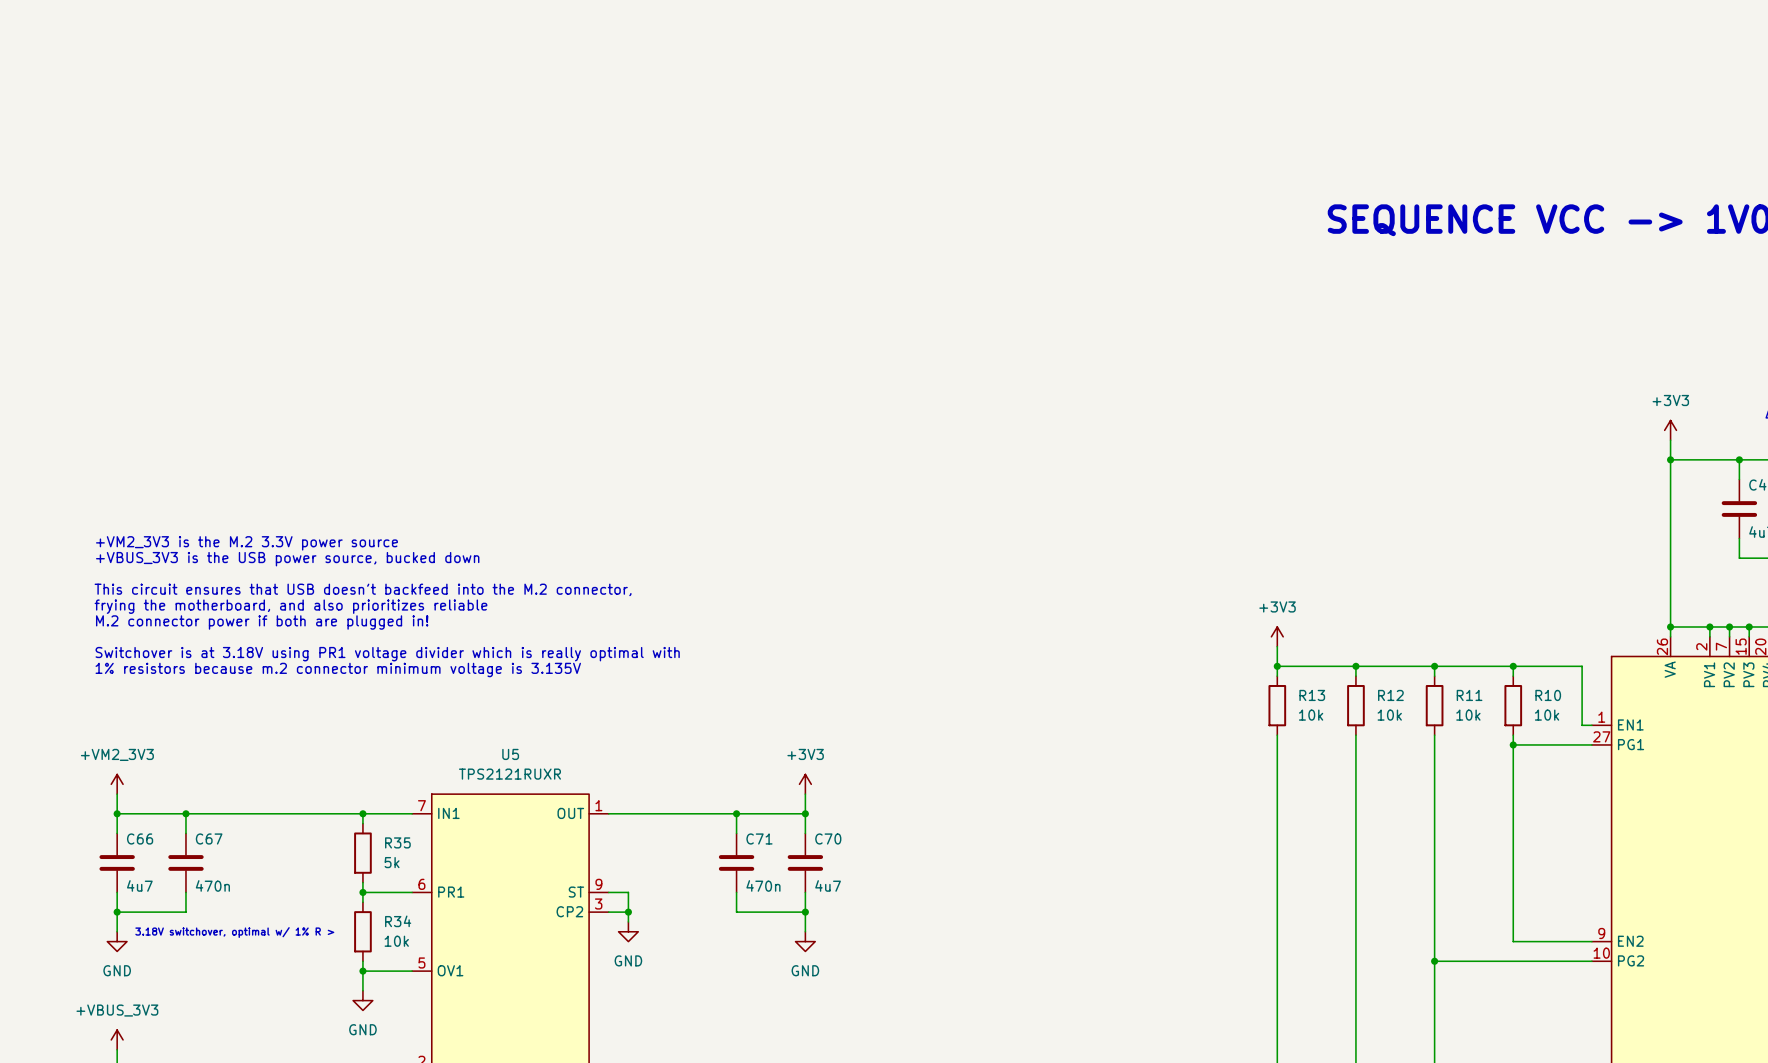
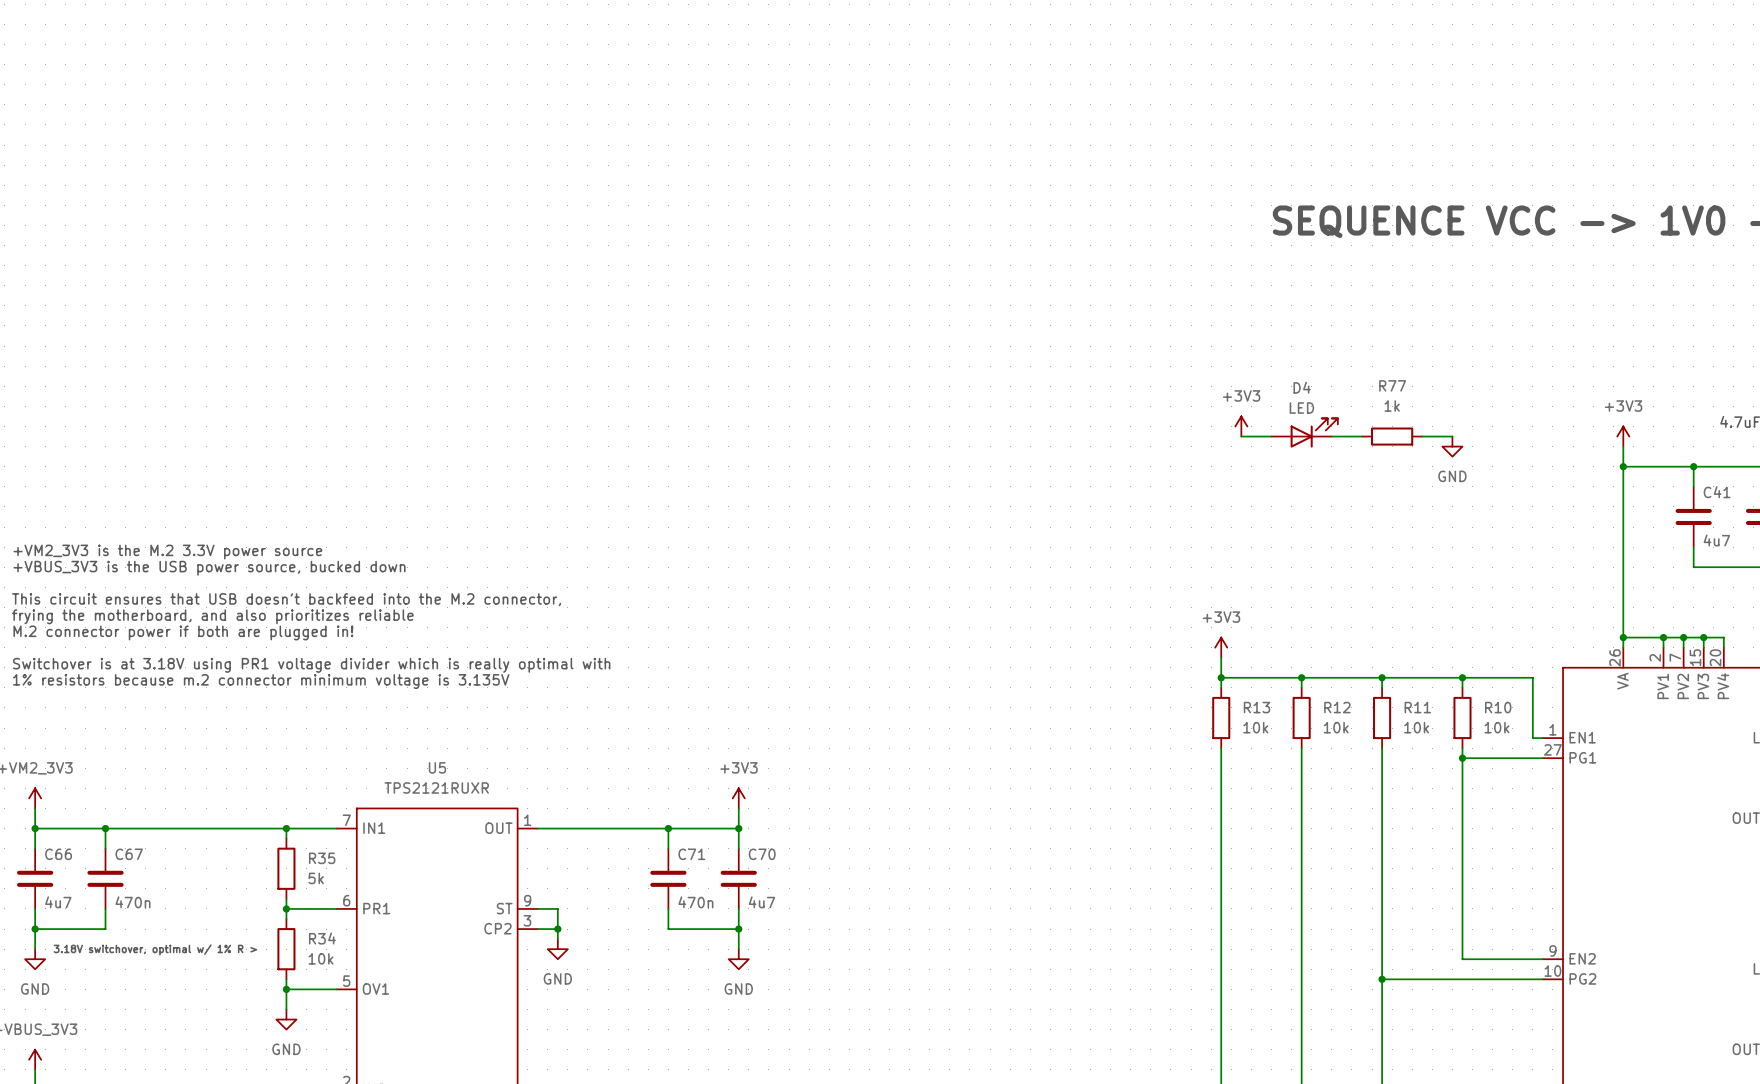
power symbol: none -> +3V3 (1241, 426)
D4: none -> LED (1304, 433)
wire: none -> (1241, 436) (1271, 436)
wire: none -> (1331, 436) (1361, 436)
R77: none -> 1k (1392, 436)
wire: none -> (1422, 436) (1452, 436)
power symbol: none -> GND (1452, 446)

